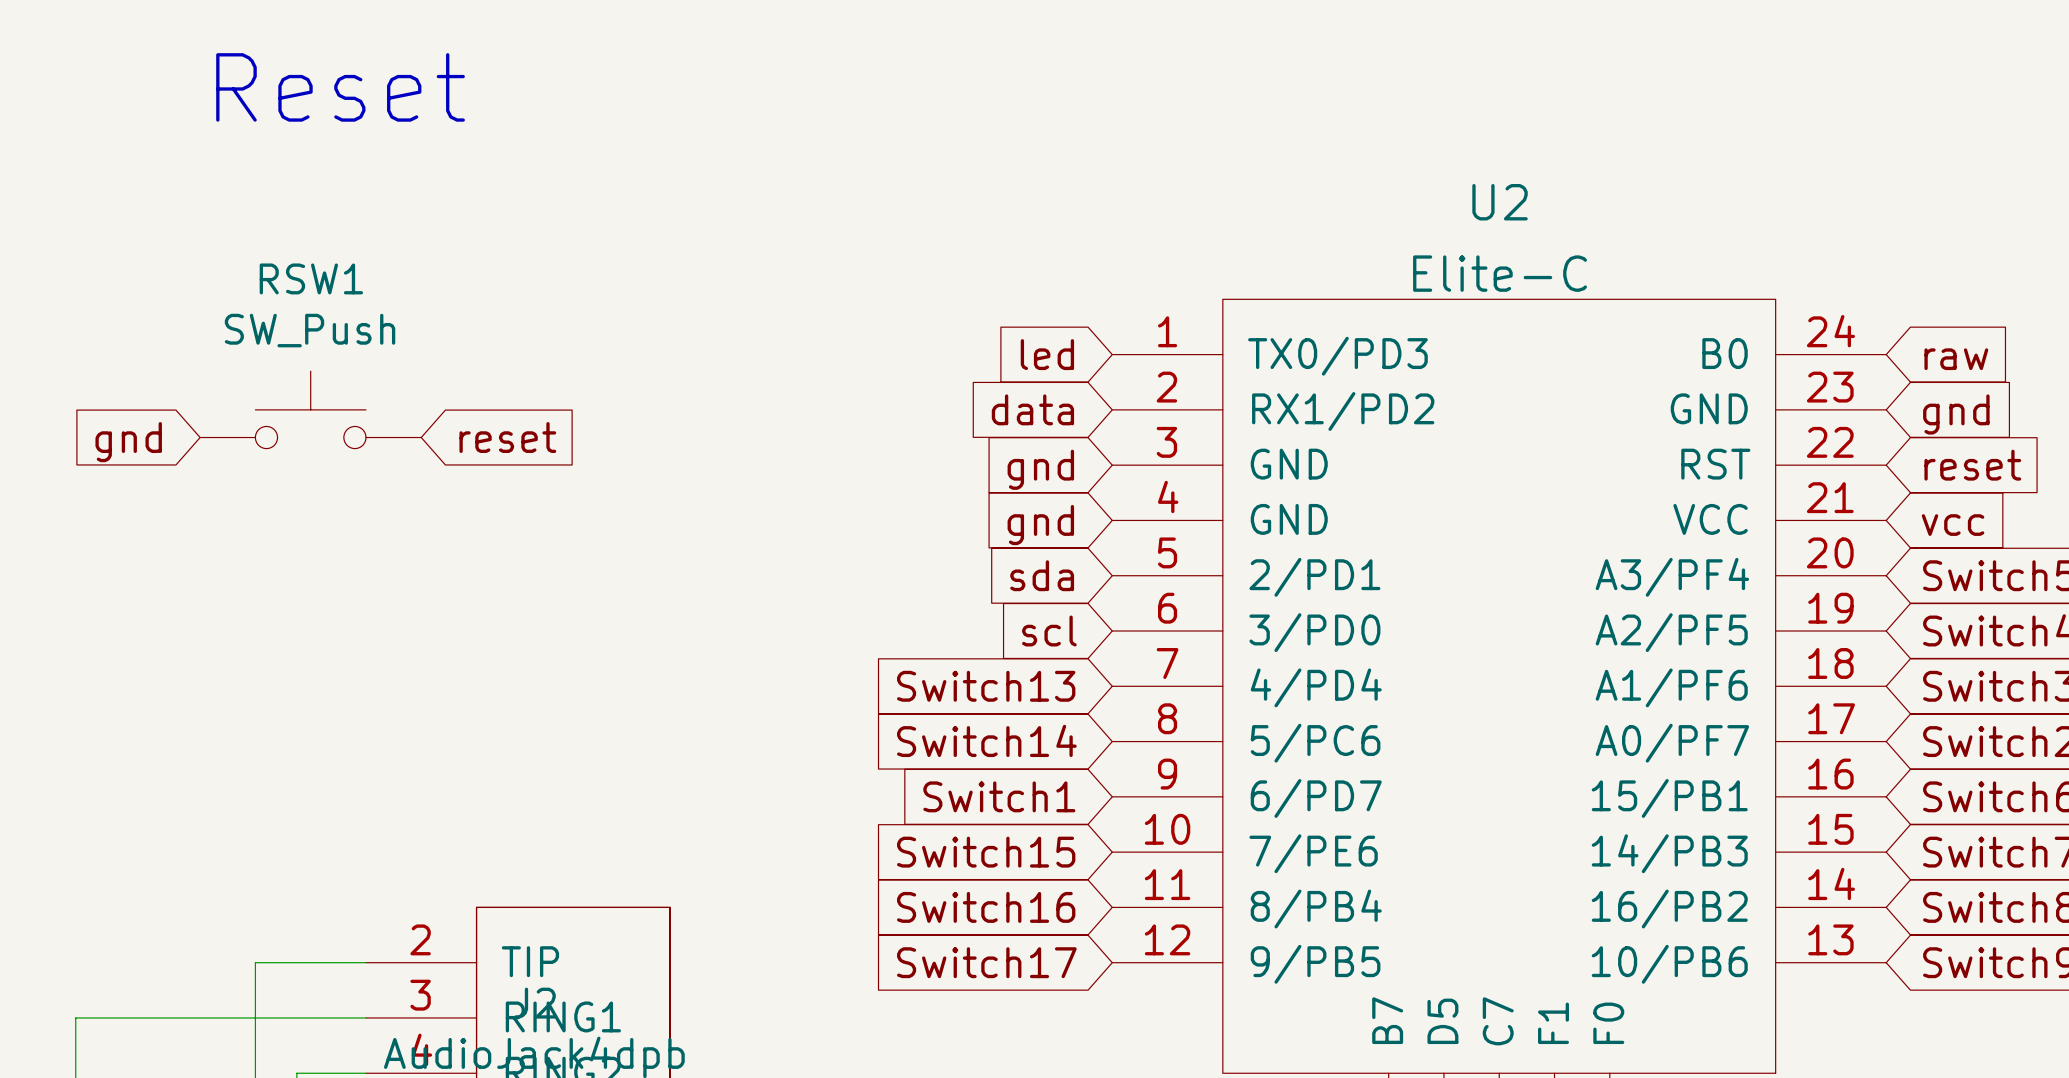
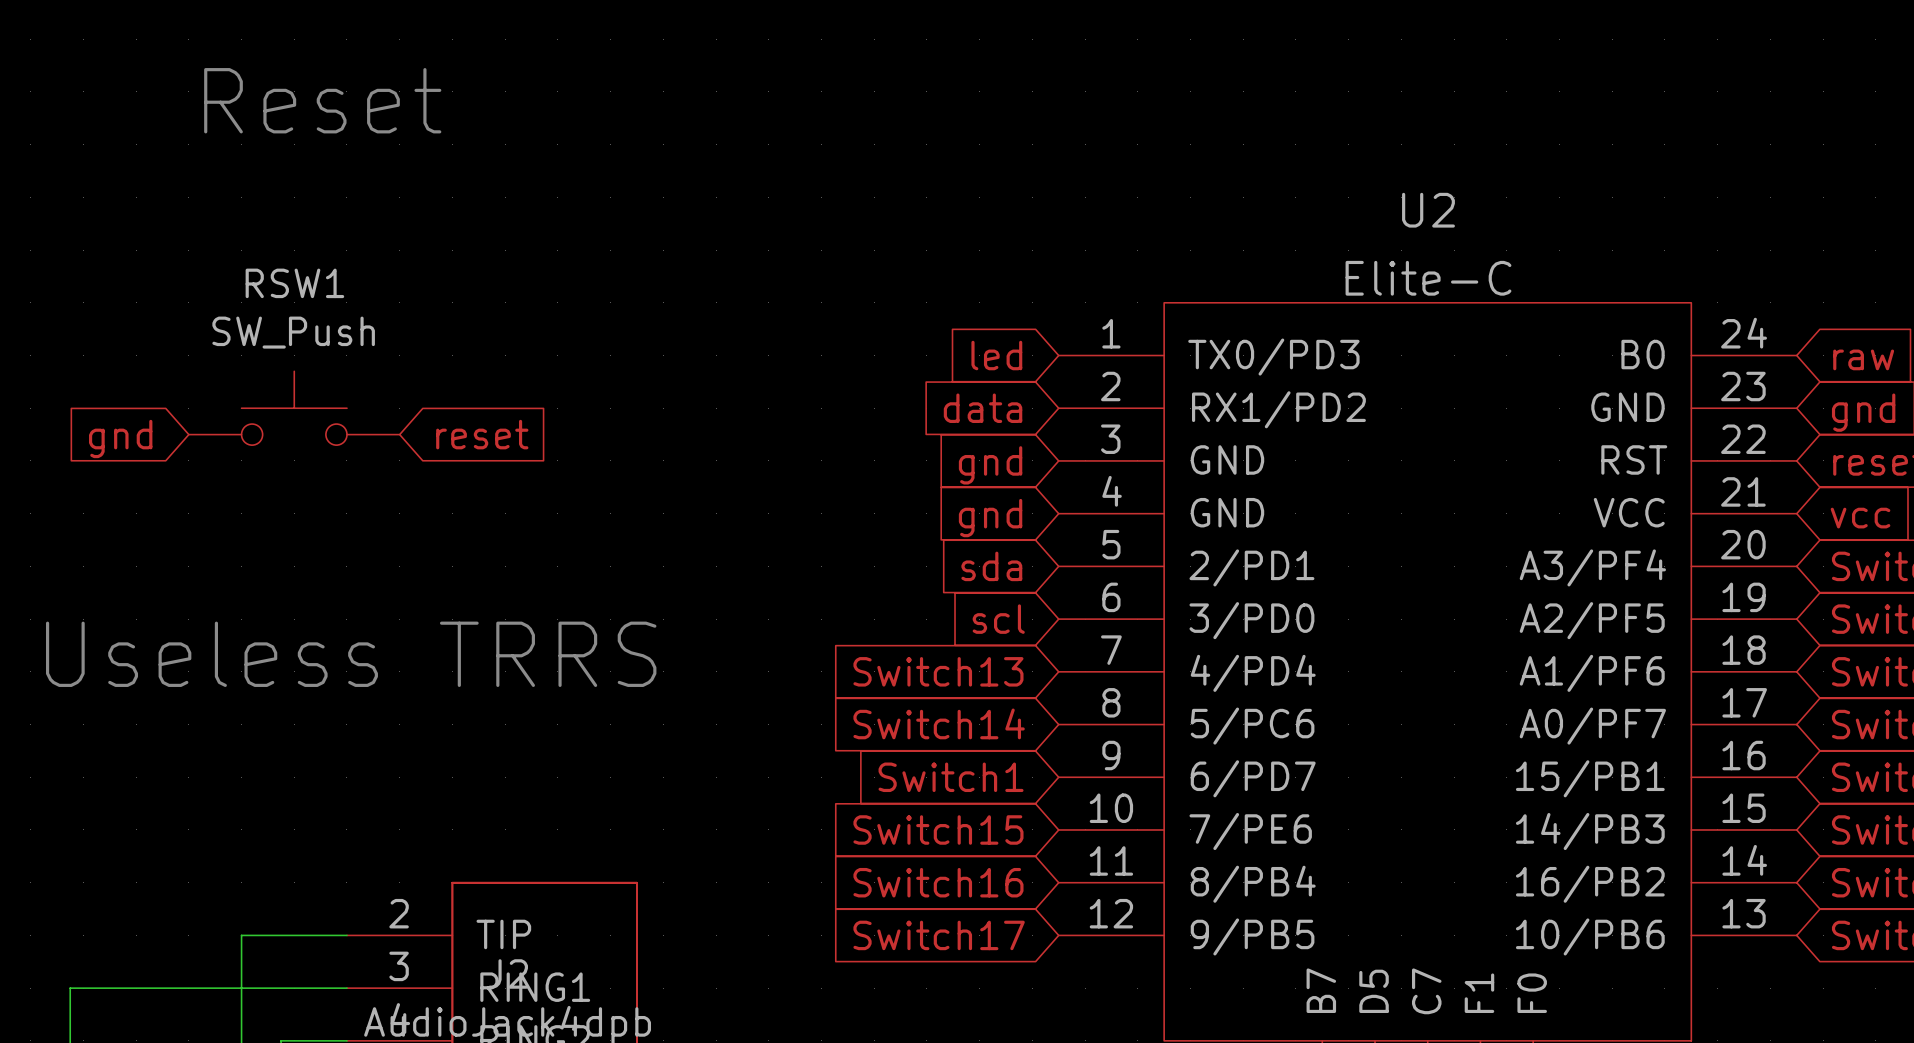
text: none -> Useless TRRS (351, 654)

